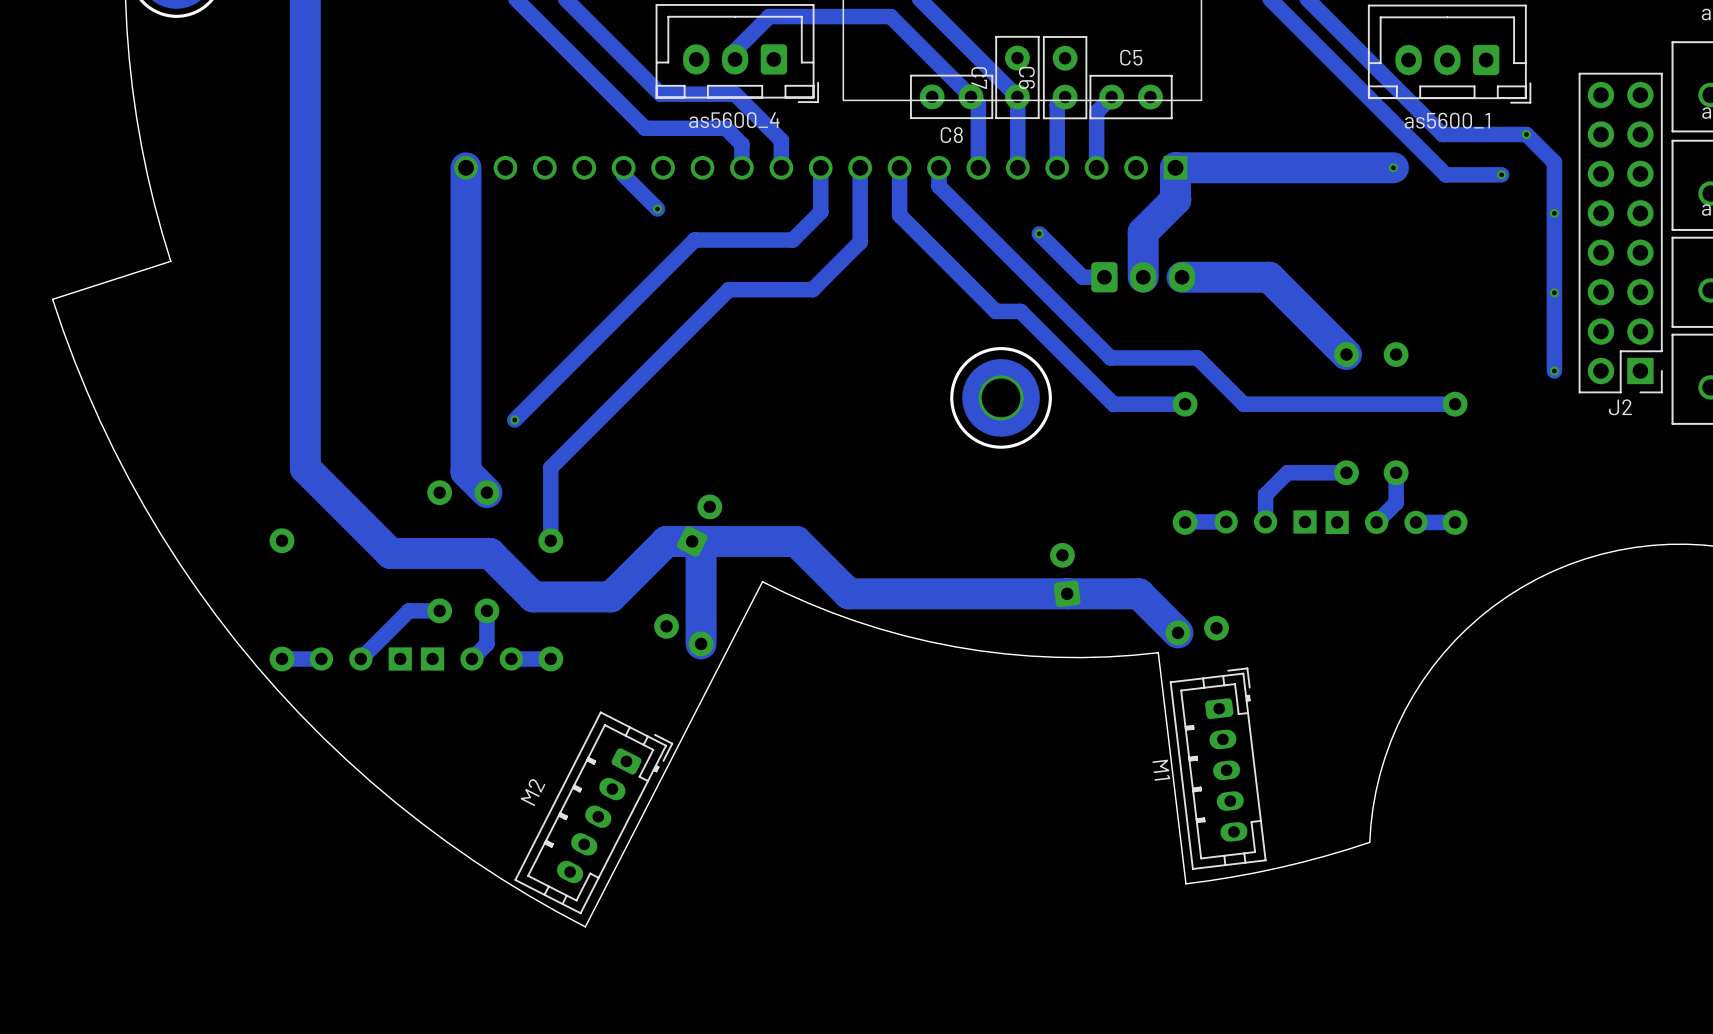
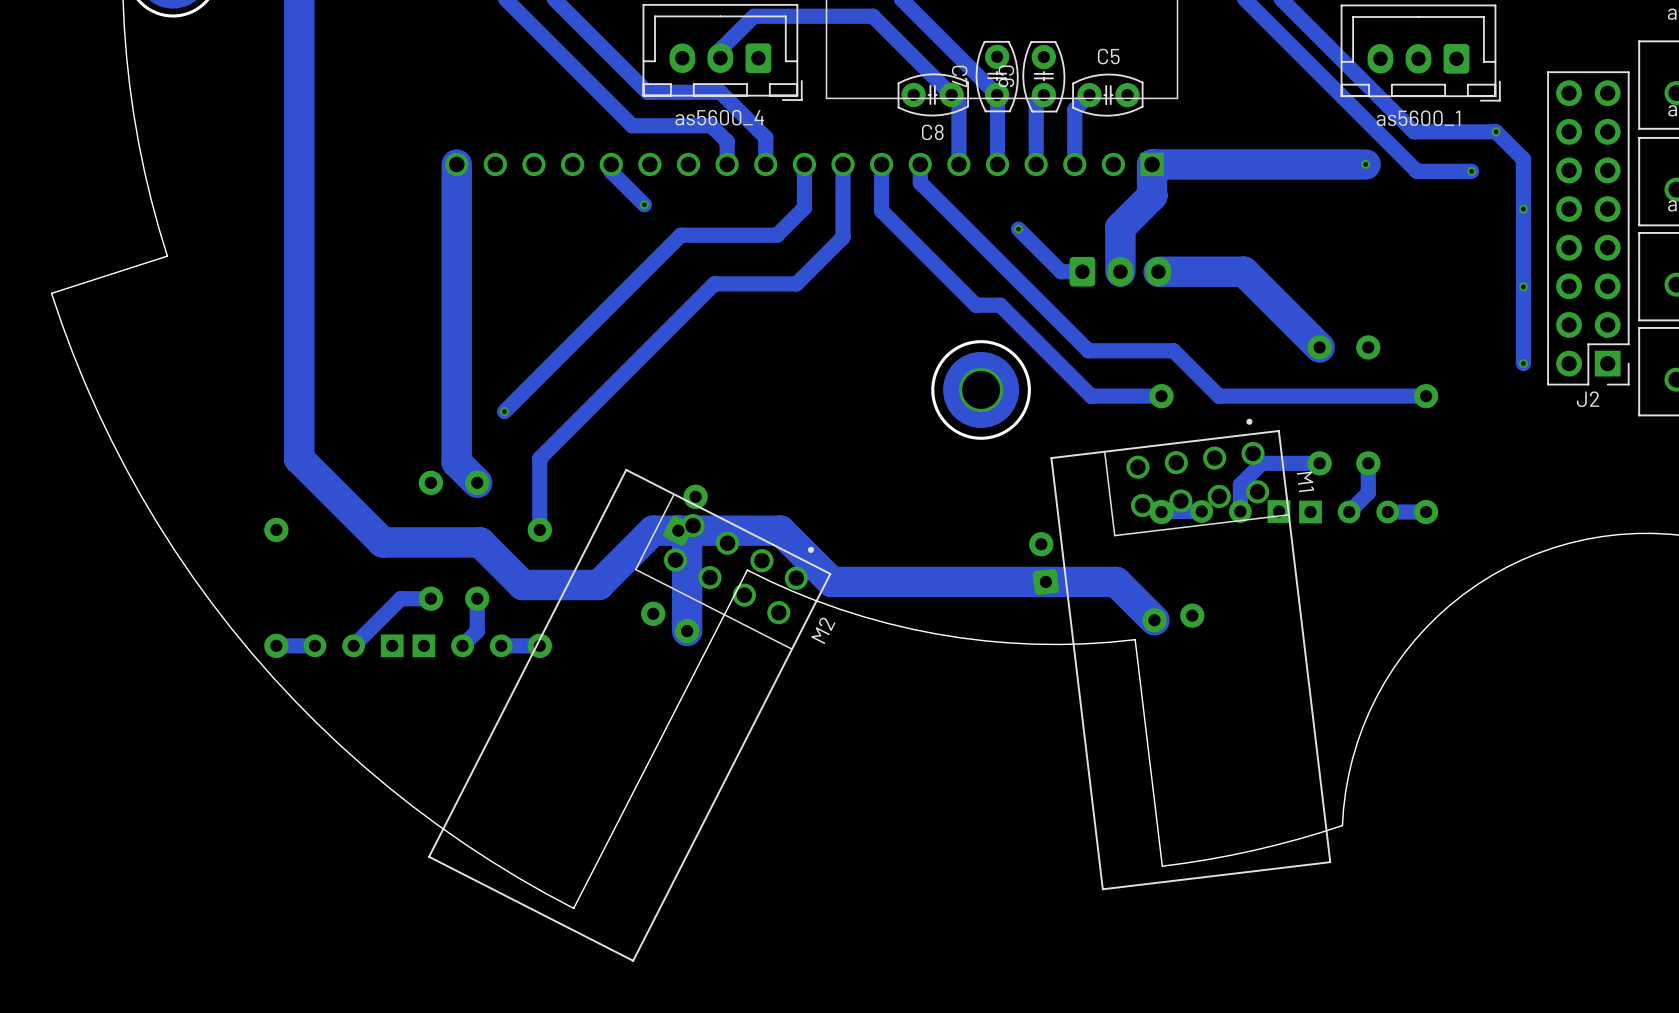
C7 footprint: [995, 35, 1040, 120] -> [975, 40, 1019, 113]
C6 footprint: [1042, 36, 1088, 120] -> [1022, 41, 1066, 113]
C8 footprint: [910, 74, 994, 120] -> [897, 73, 969, 117]
C5 footprint: [1089, 74, 1173, 120] -> [1072, 73, 1144, 117]
M1 footprint: [1169, 667, 1267, 870] -> [1050, 418, 1332, 891]
M2 footprint: [514, 711, 674, 915] -> [428, 468, 832, 962]
M1 name position: M1 (1161, 770) -> M1 (1305, 481)
M2 name position: M2 (533, 792) -> M2 (823, 630)

